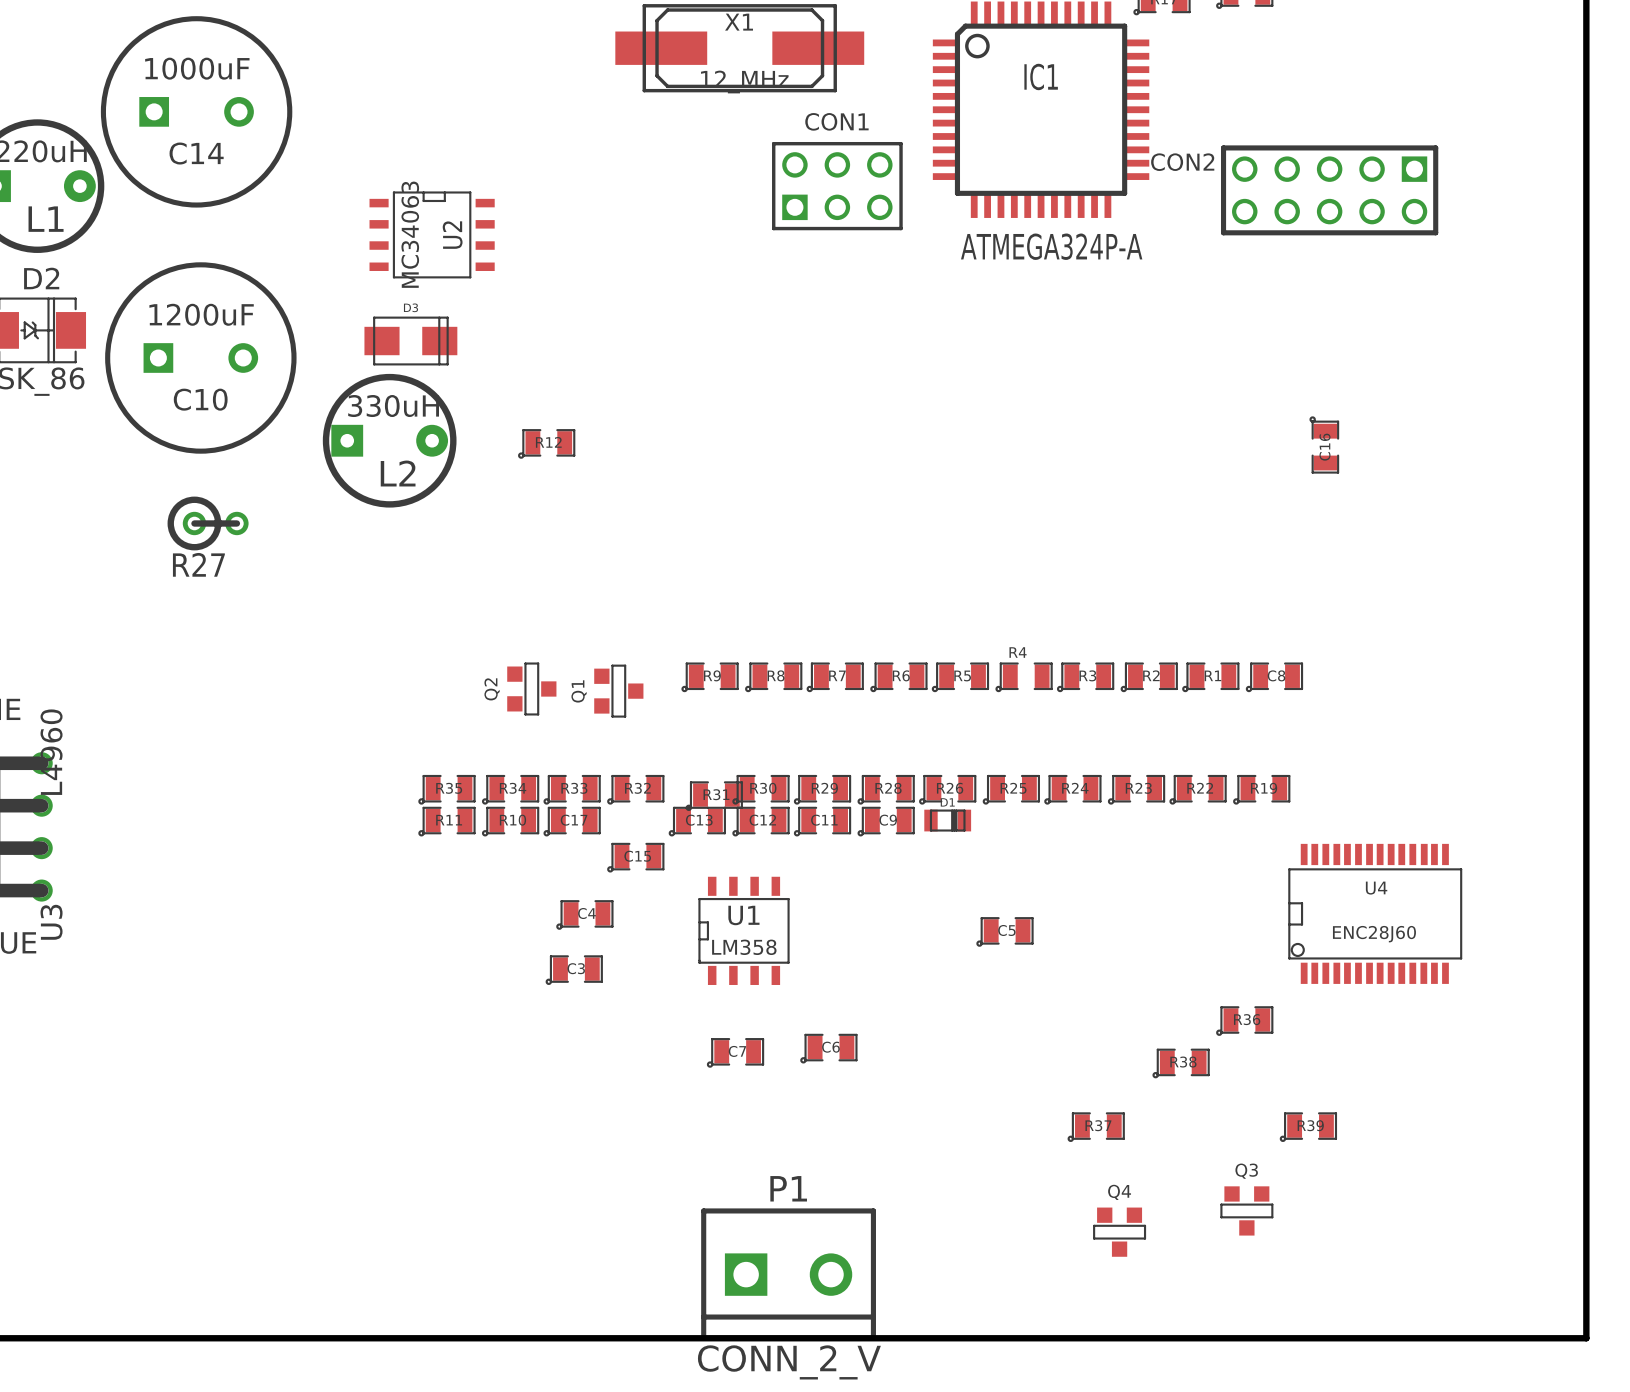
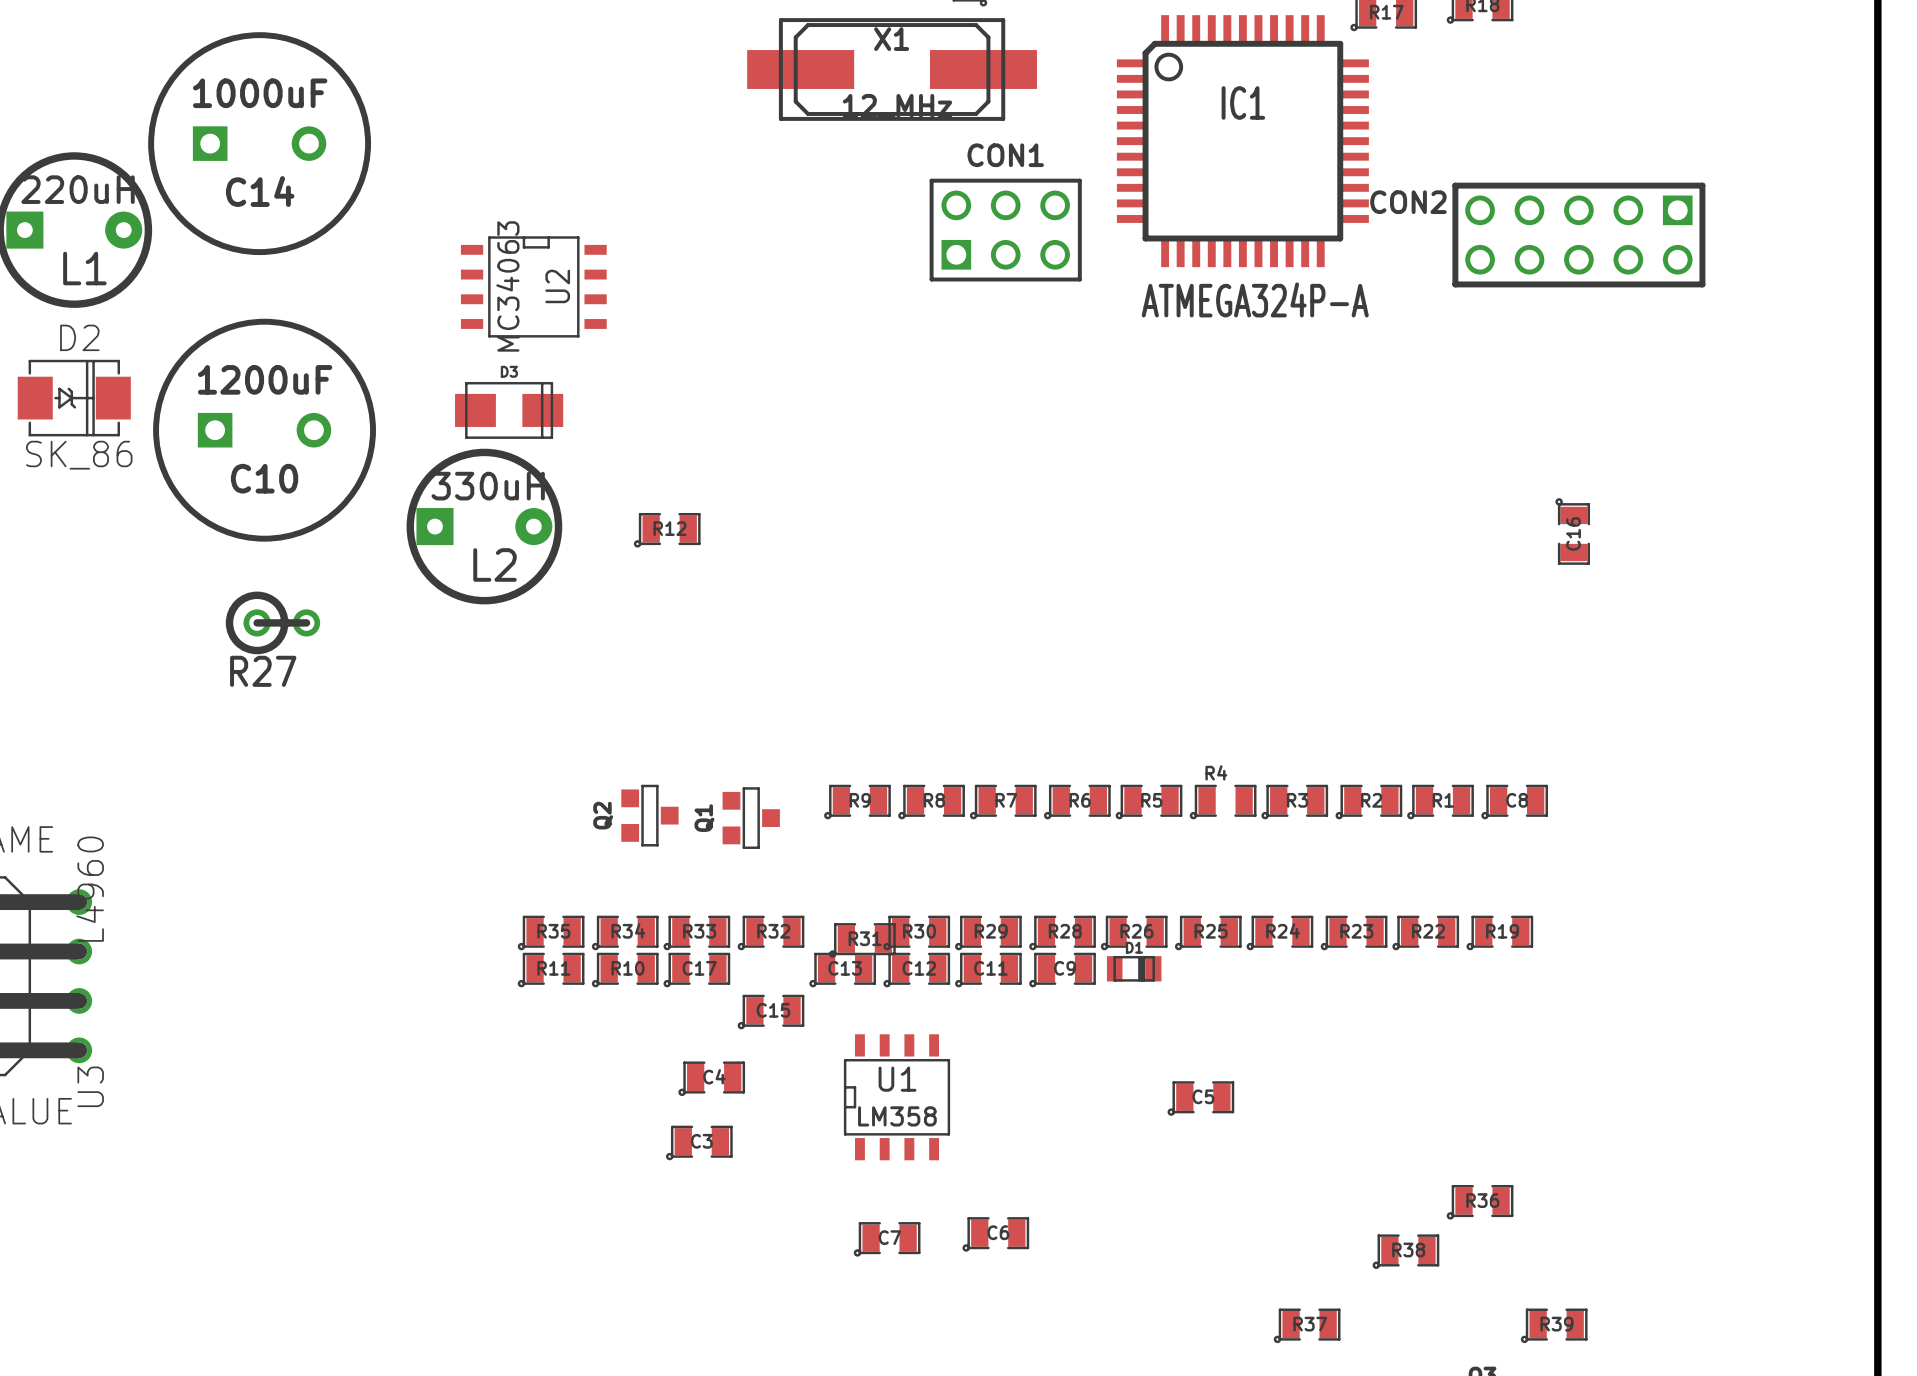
U4: ENC28J60 (1375, 913) -> none

